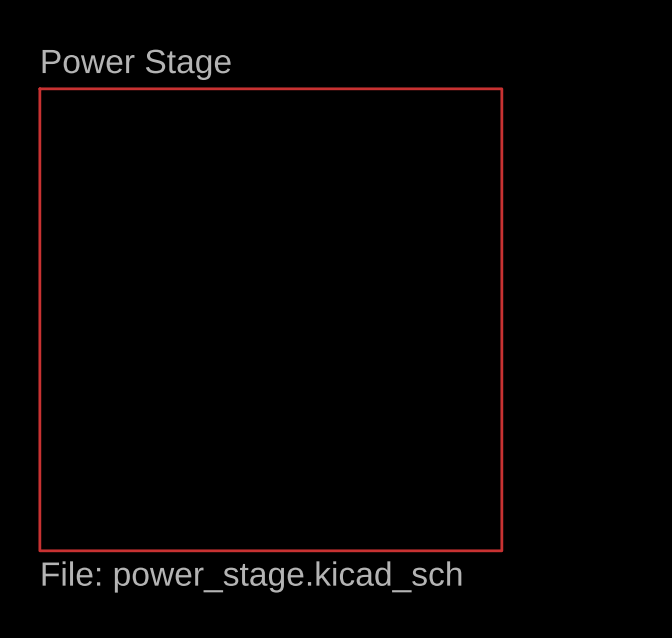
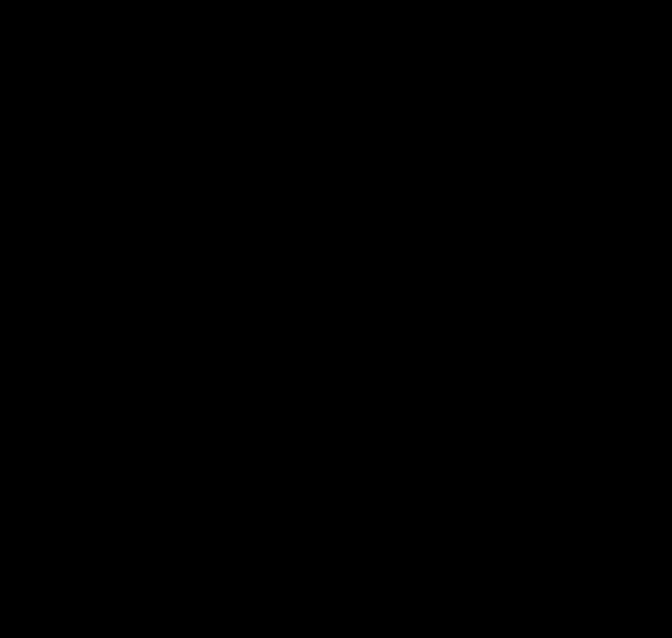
sheet Power Stage: File: power_stage.kicad_sch (270, 319) -> none

